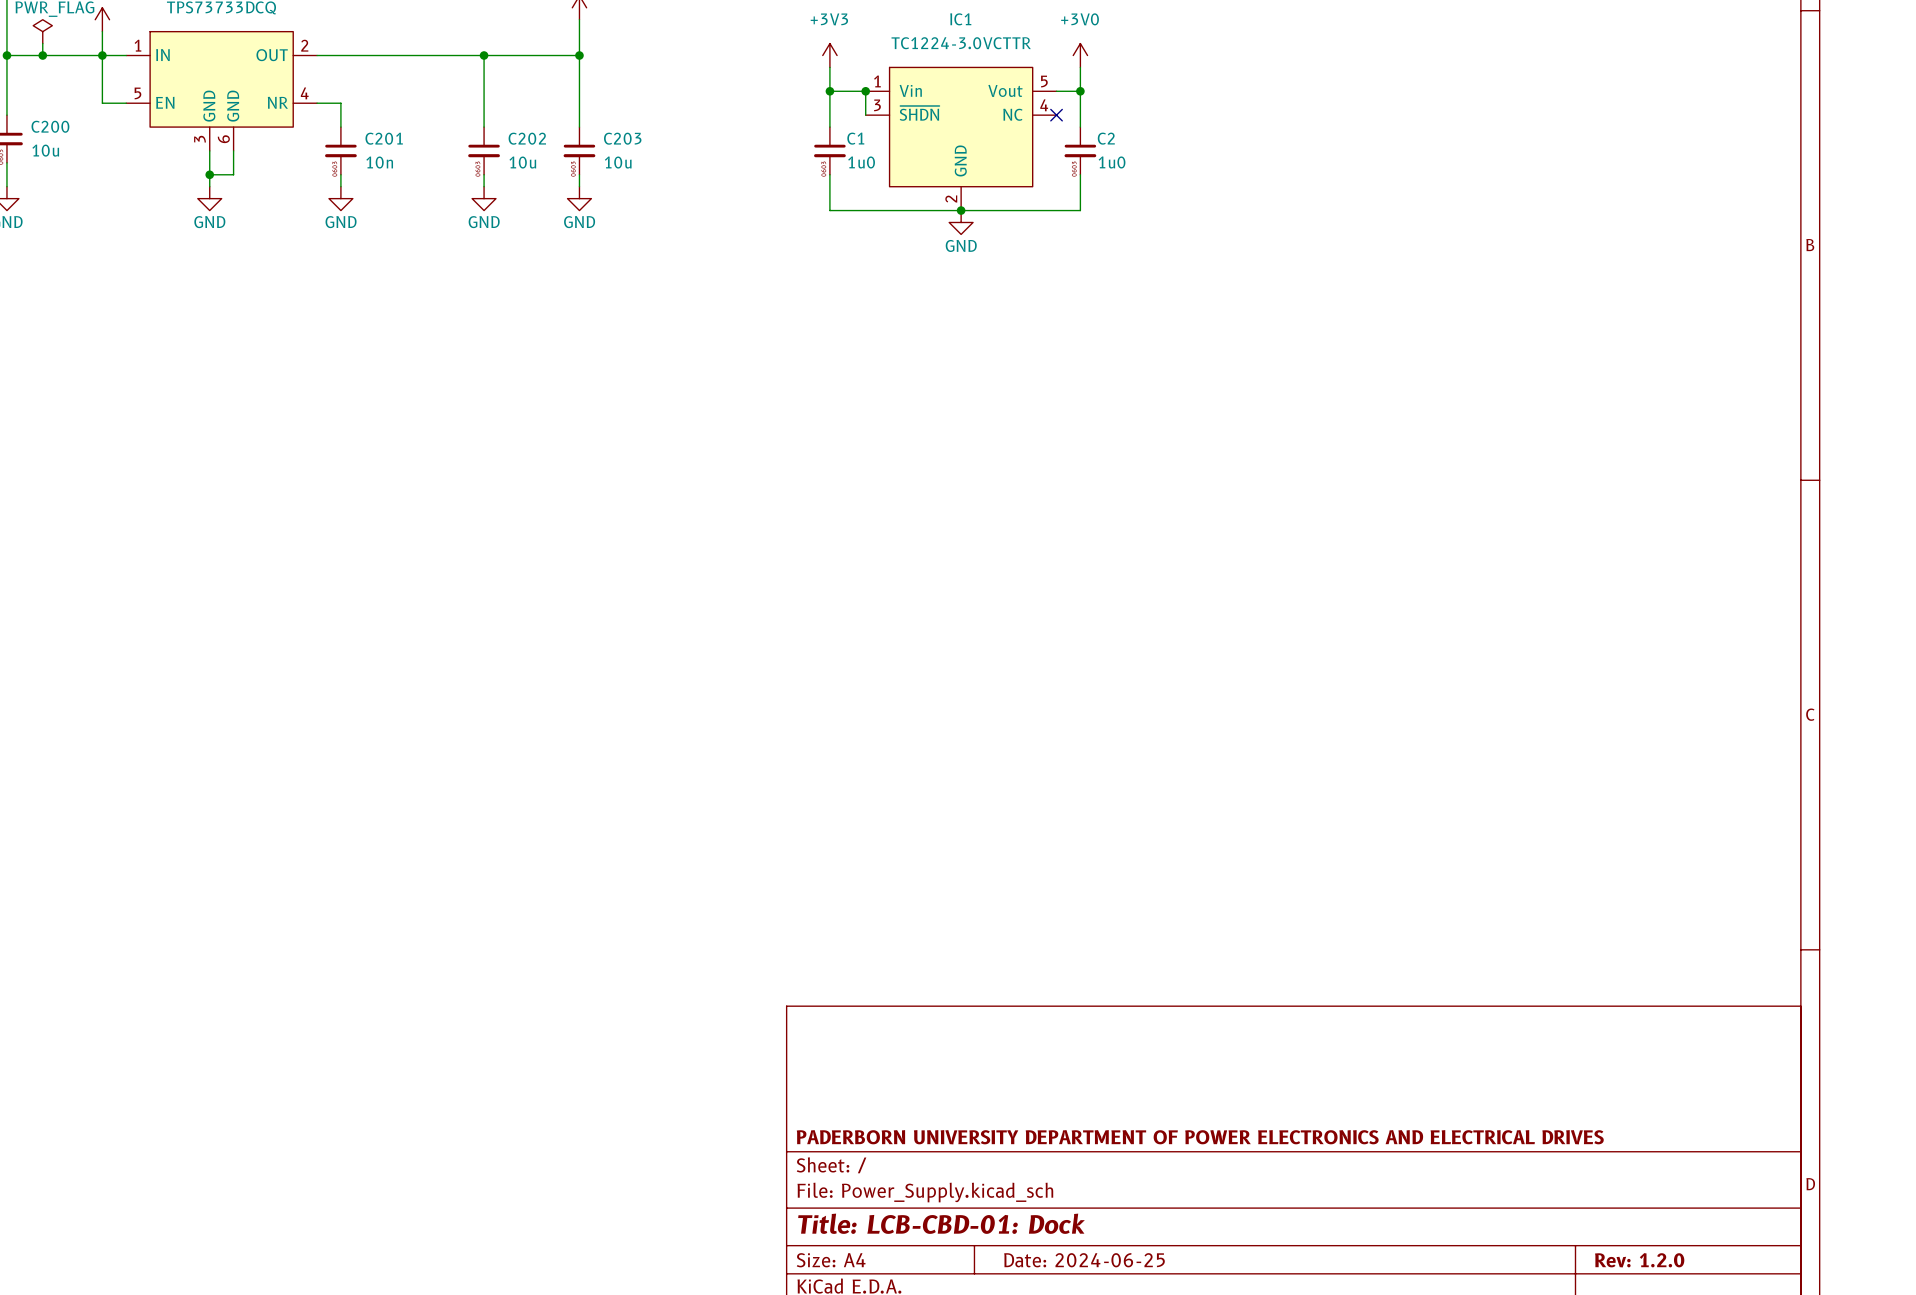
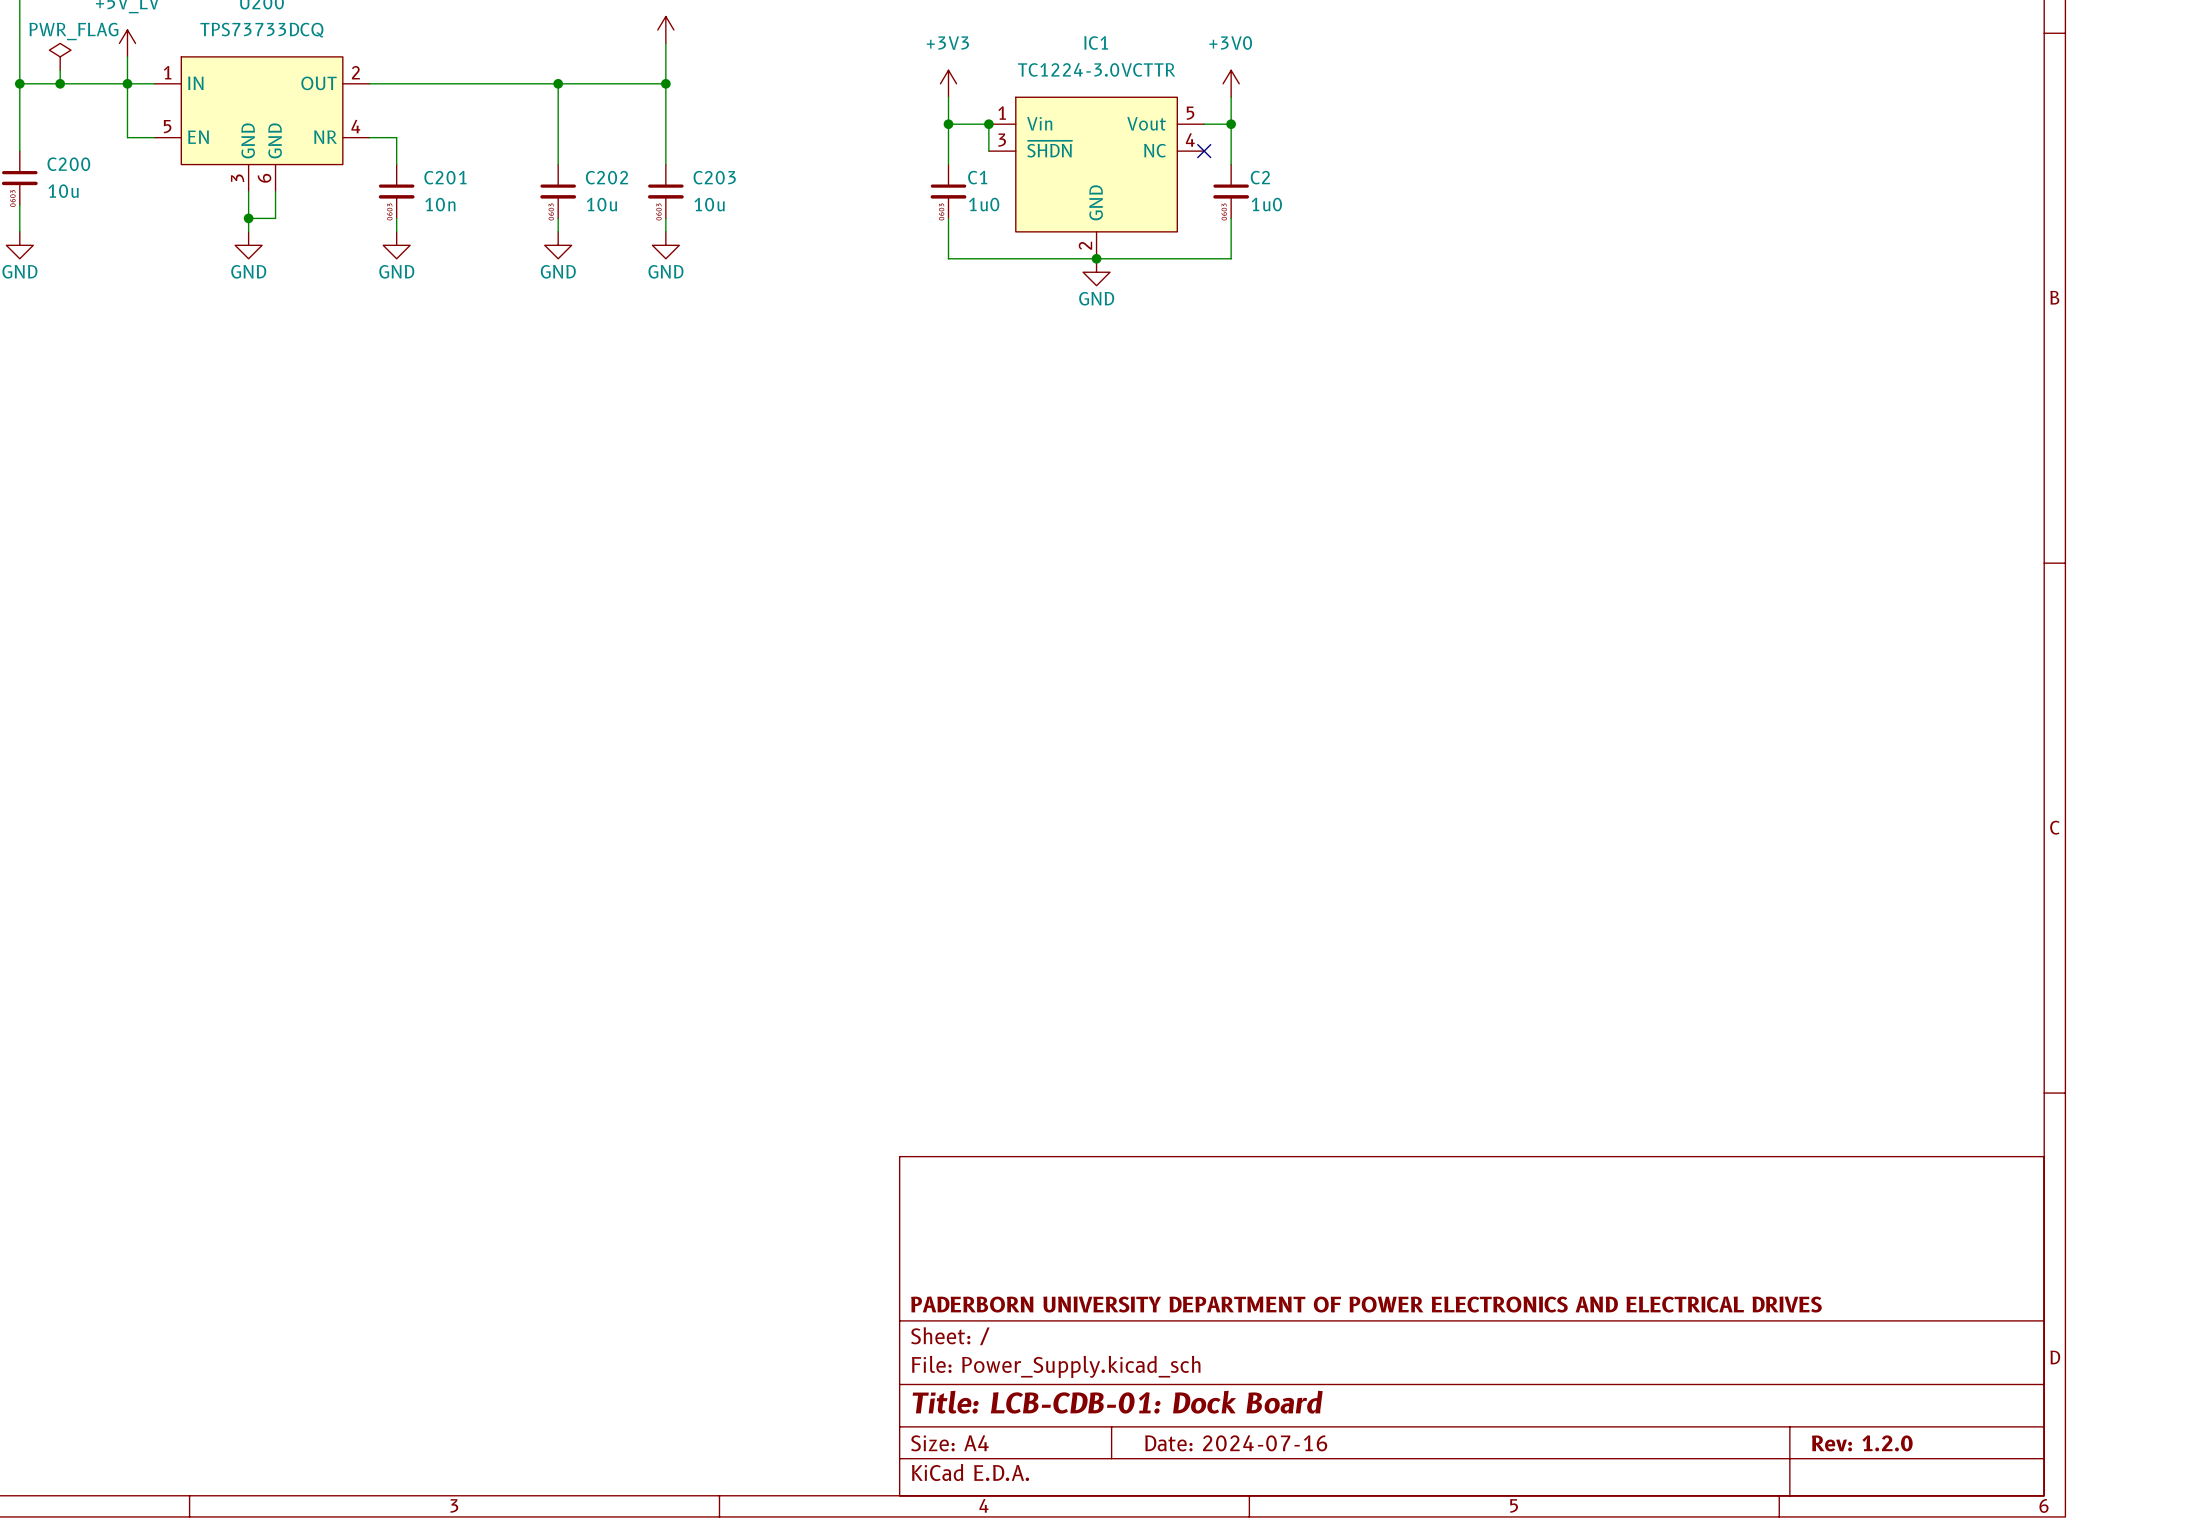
title block: Title: LCB-CBD-01: Dock (941, 1223) -> Title: LCB-CDB-01: Dock Board (1117, 1402)
title block: Date: 2024-06-25 (1084, 1260) -> Date: 2024-07-16 (1236, 1443)

